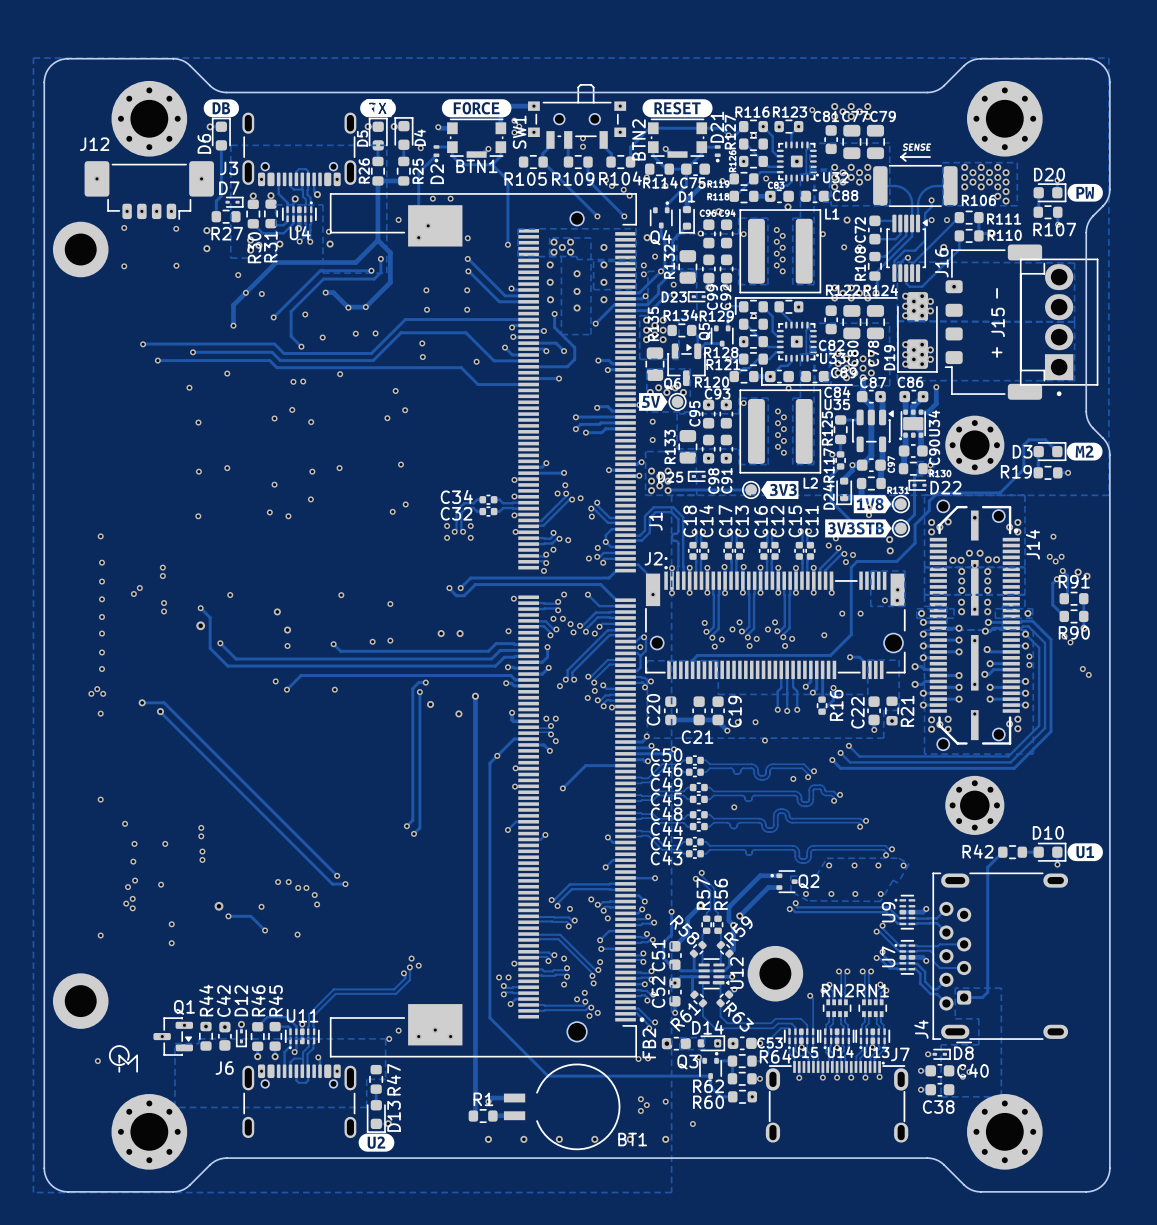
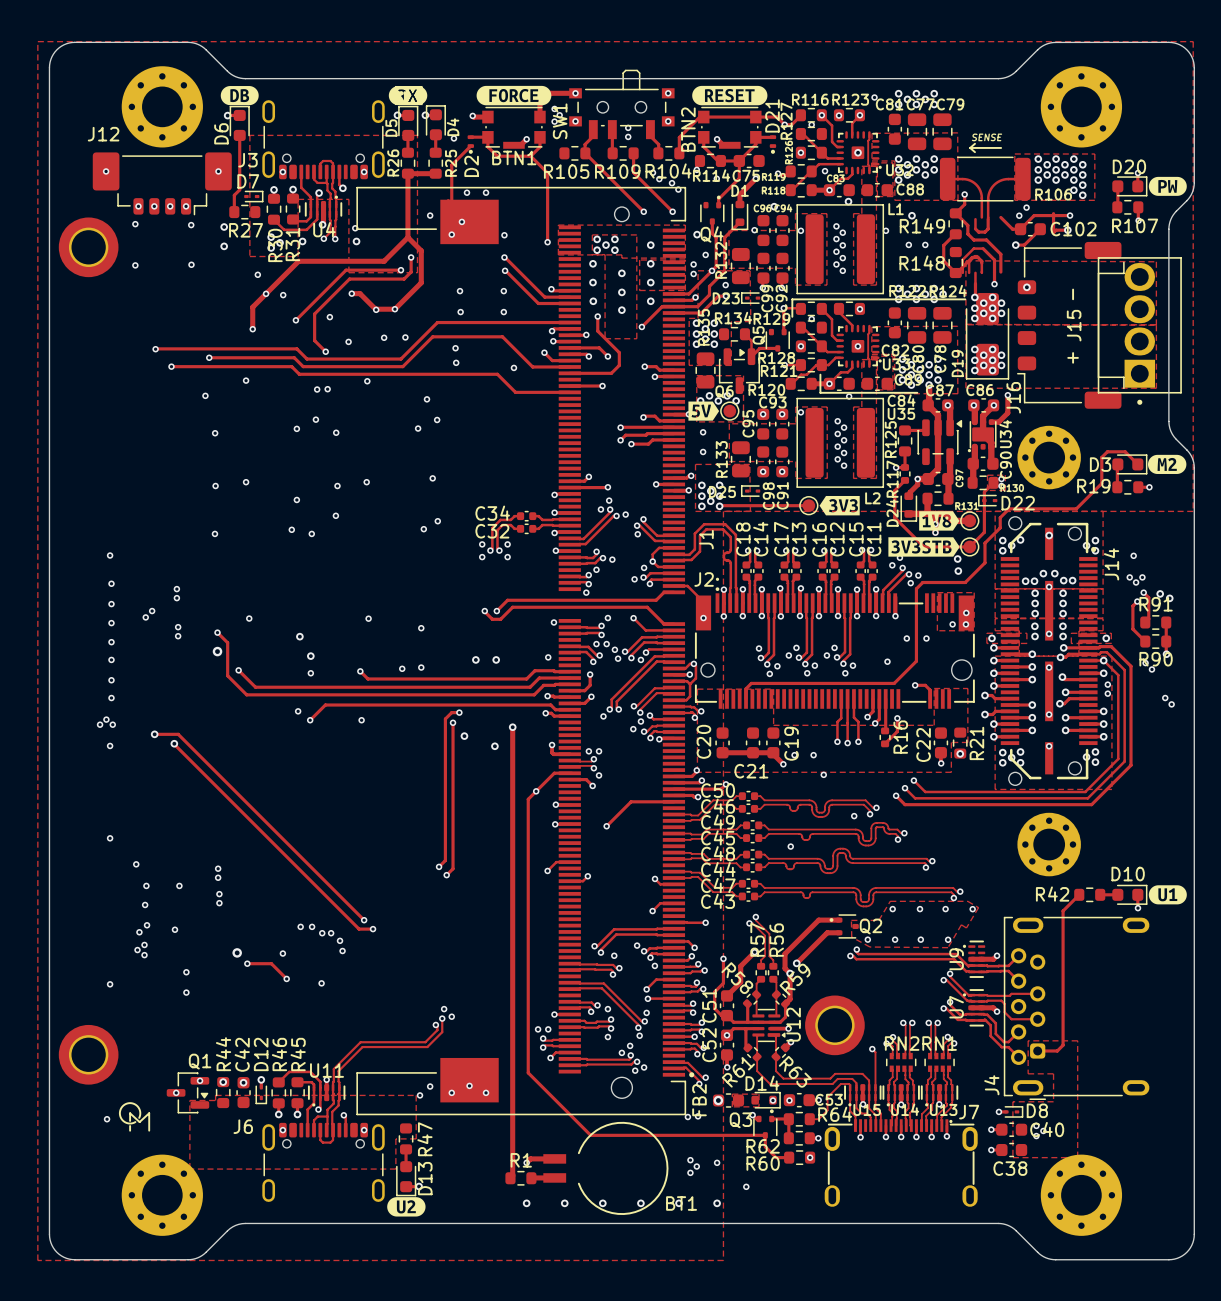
track: none -> (964, 194) (964, 204) (955, 213) (967, 225) (967, 233) (973, 240) (986, 240) (1000, 254) (1000, 272)
via: none -> (964, 194)
track: (931, 200) (931, 206) (925, 213) (925, 240) (913, 250) -> (994, 284) (994, 260) (983, 248)
via: (931, 200) -> none
via: none -> (1026, 207)
track: (959, 217) (912, 264) -> (955, 234) (943, 245) (943, 260) (955, 273) (972, 257) (978, 257) (981, 263)
R111: (969, 217) -> none
track: none -> (1070, 215) (1034, 215) (1020, 229) (1012, 229) (1000, 217)
via: none -> (1070, 215)
track: (874, 220) (894, 220) (894, 223) -> none
via: (931, 220) -> none
track: (912, 221) (912, 236) (874, 273) (877, 278) (877, 291) -> none
track: (900, 223) (900, 234) (895, 239) (874, 239) -> none
R149: none -> (955, 223)
C72: (874, 230) -> none
track: (906, 232) (906, 235) (884, 256) (874, 256) -> (975, 228) (978, 232) (984, 232) (988, 228) (988, 219)
C102: none -> (1030, 229)
track: none -> (1040, 229) (1024, 245) (1015, 245)
track: (959, 235) (959, 249) (922, 286) (909, 286) (906, 283) -> (974, 297) (975, 283)
R110: (969, 235) -> none
part: (907, 248) -> none
via: (907, 257) -> none
J16 name position: J16 (941, 262) -> J16 (1013, 397)
R148: none -> (955, 262)
R108: (874, 266) -> none
via: none -> (994, 284)

